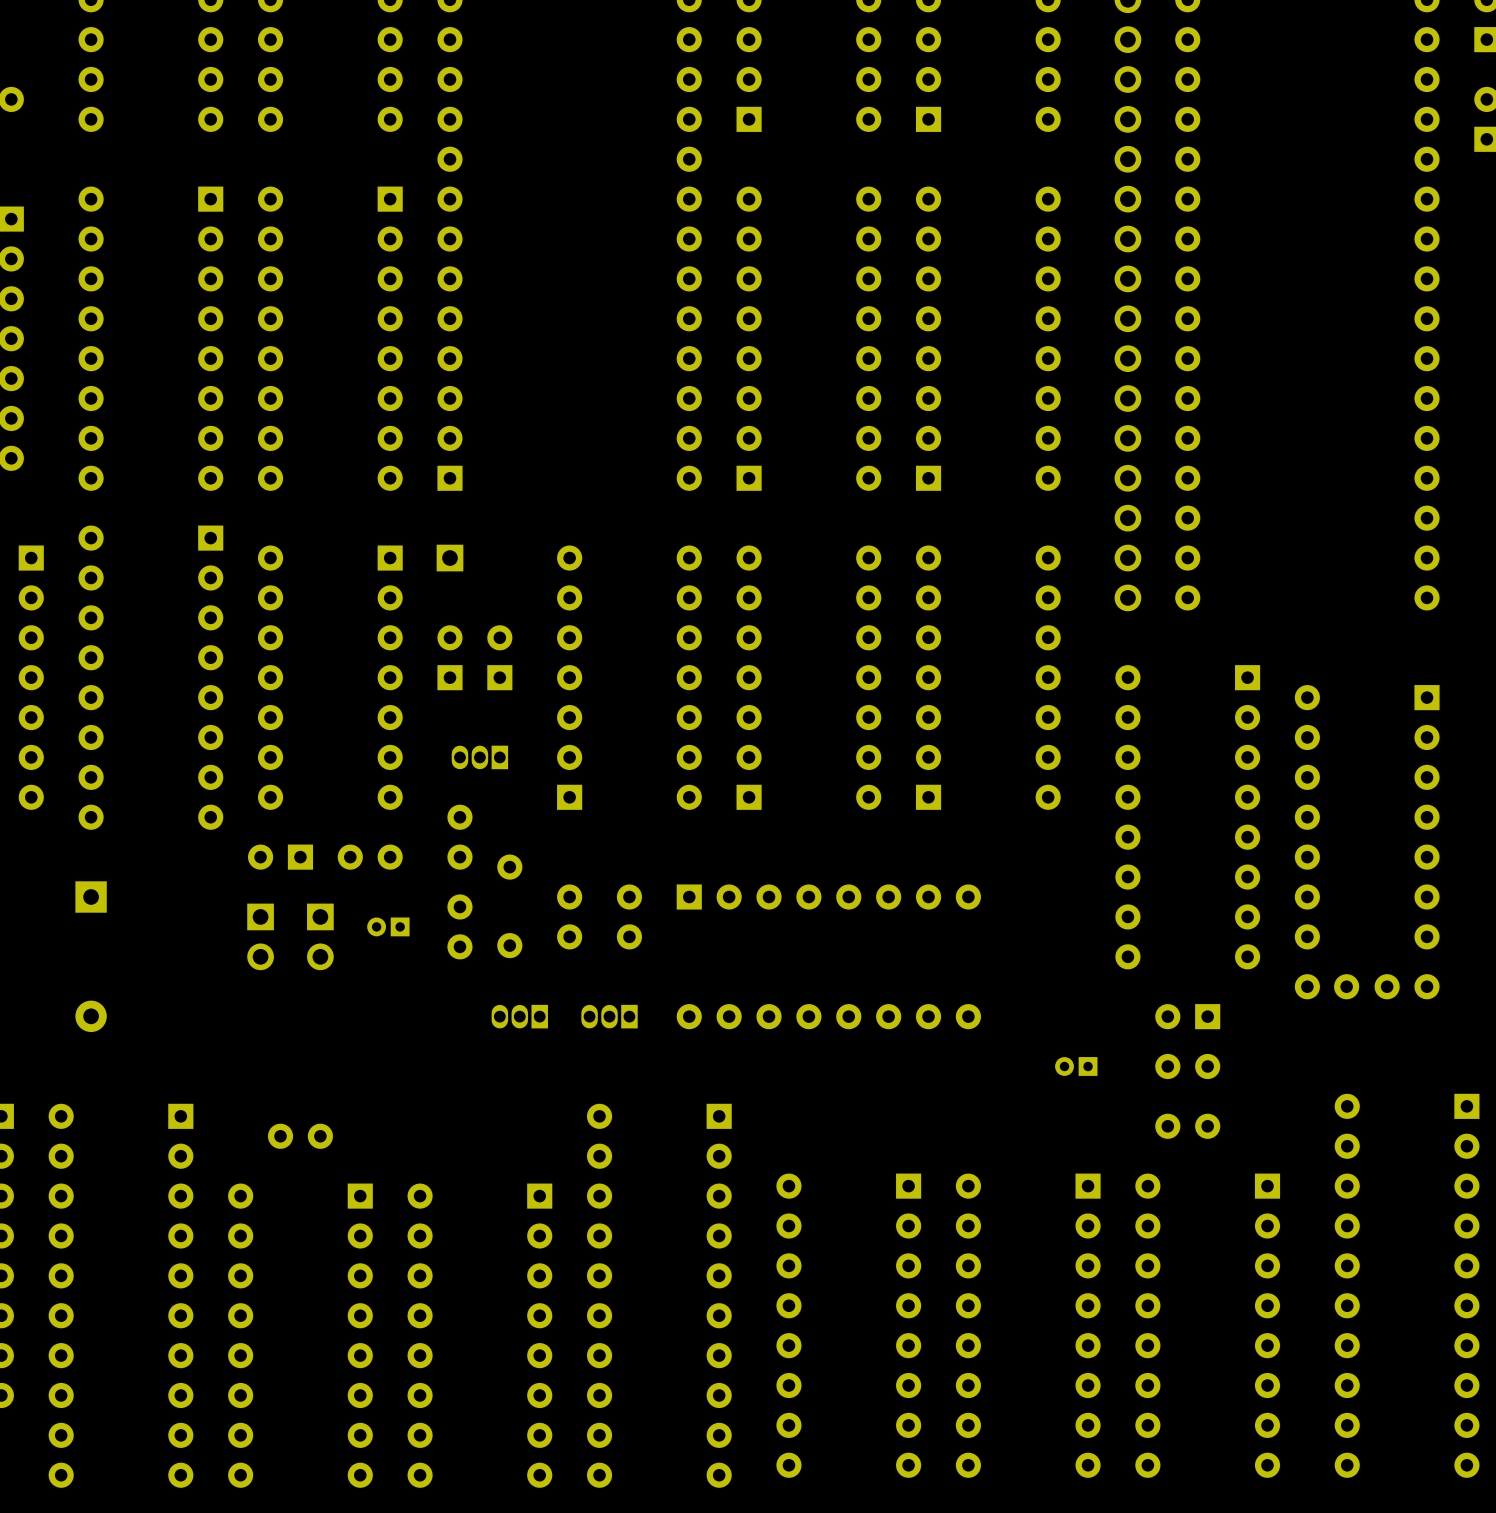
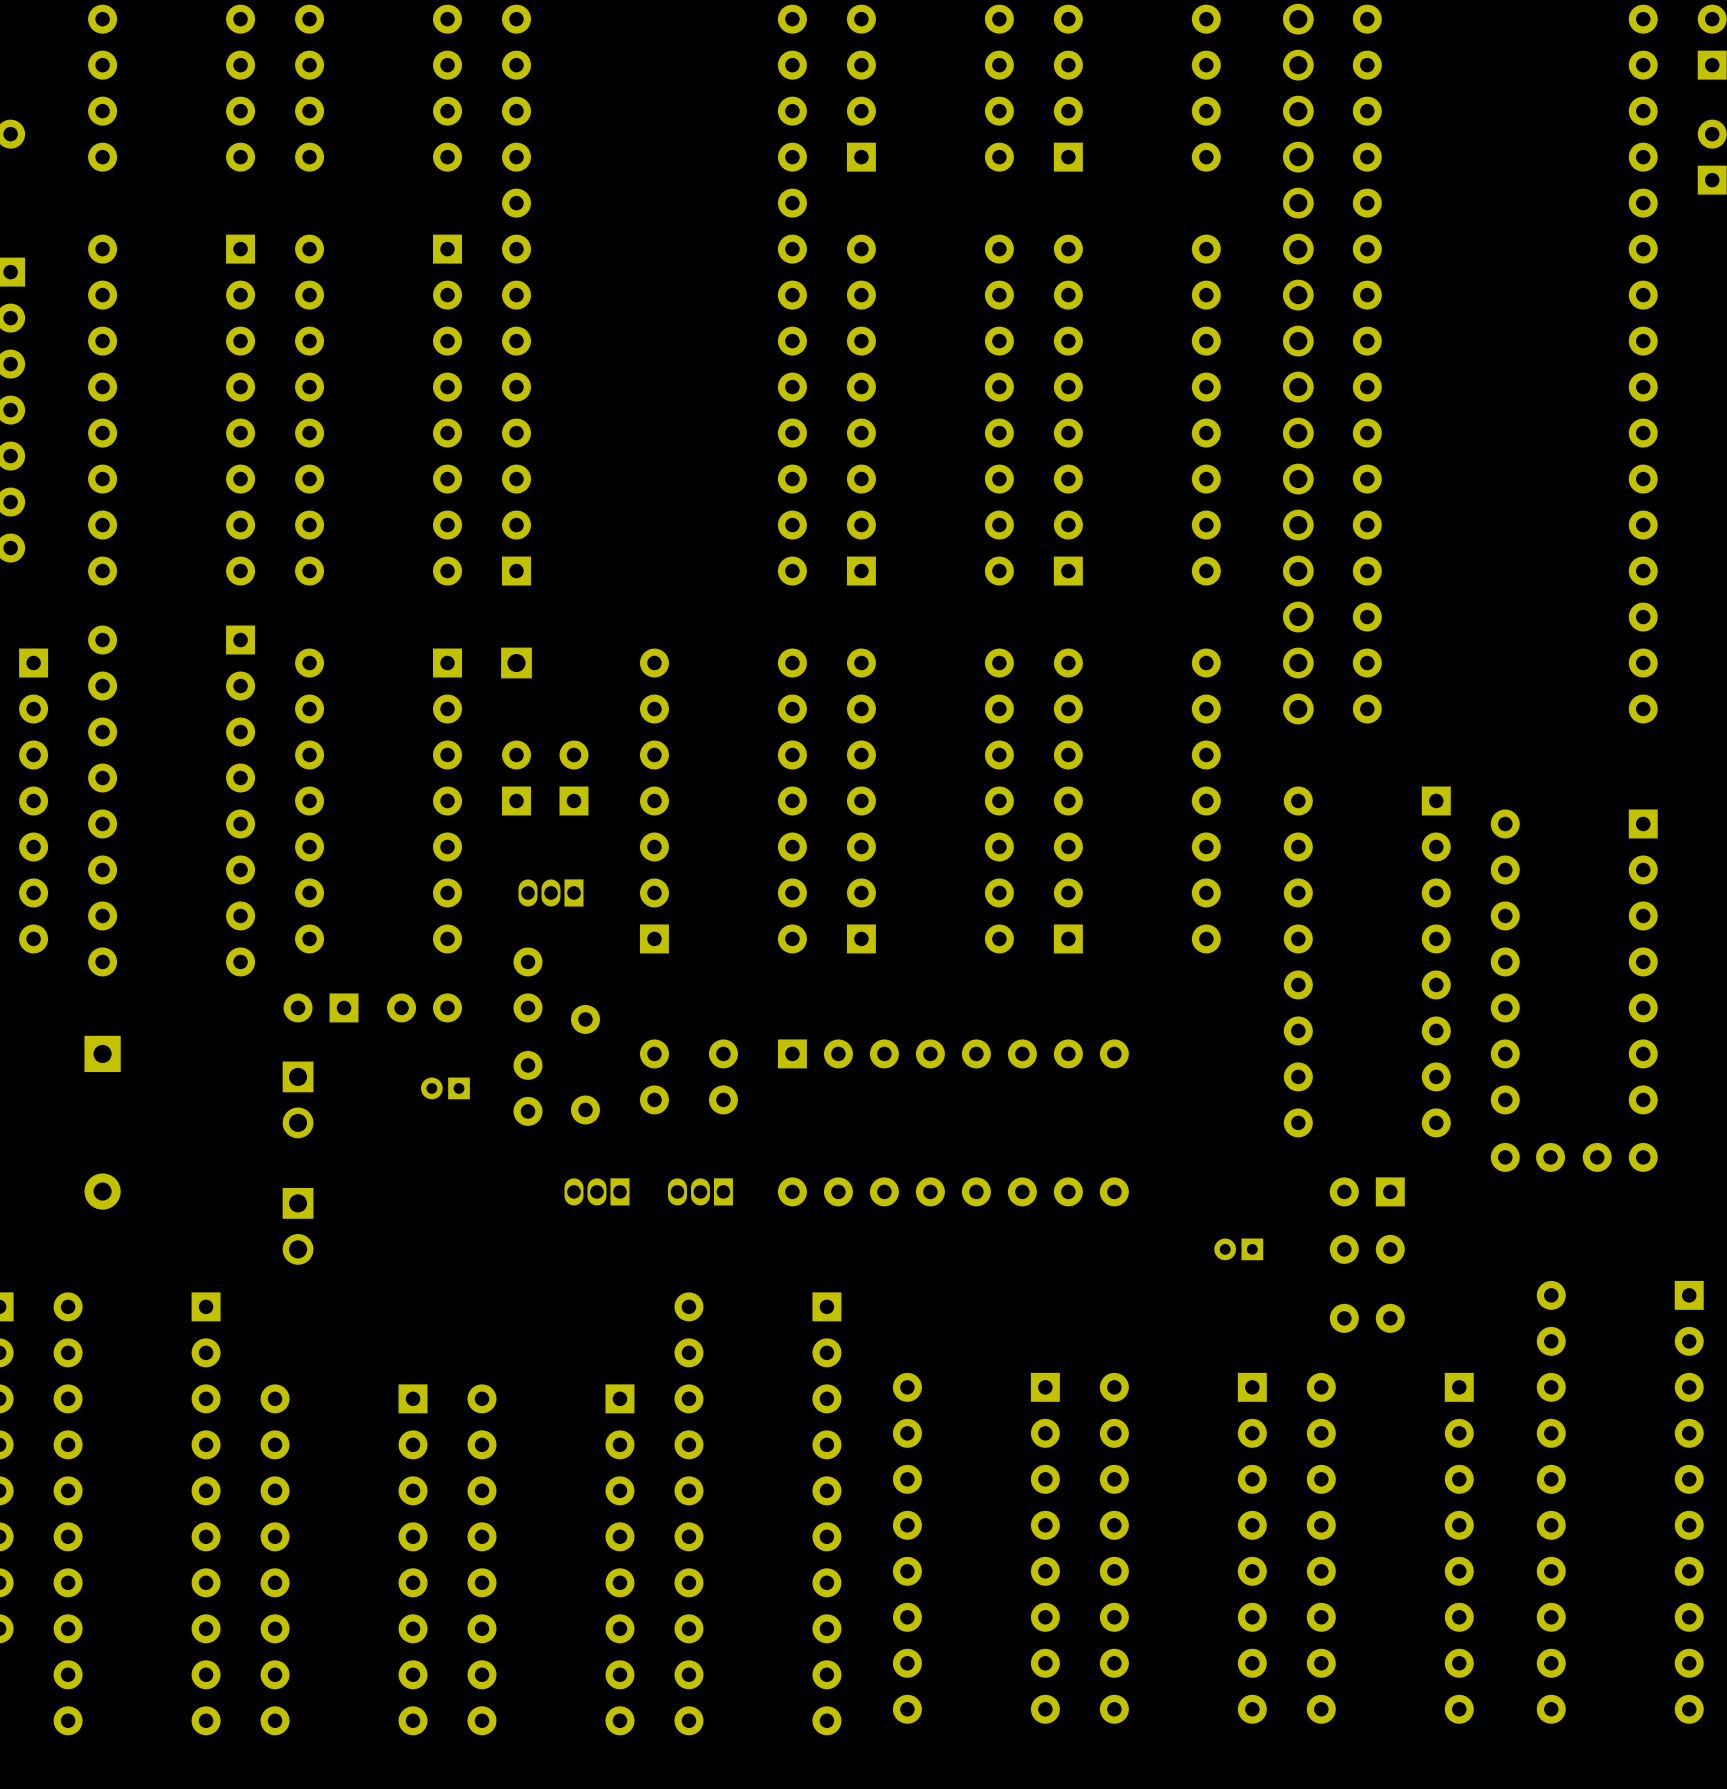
part position: (320, 936) -> (298, 1226)
part: (300, 1136) -> none

